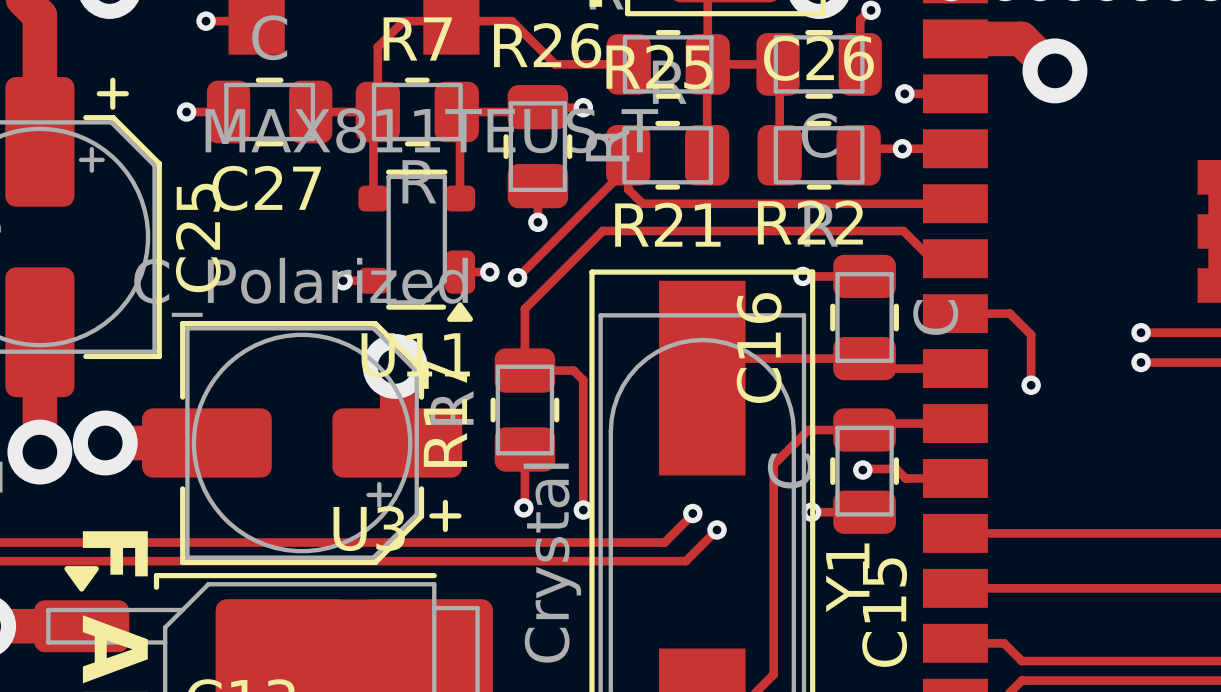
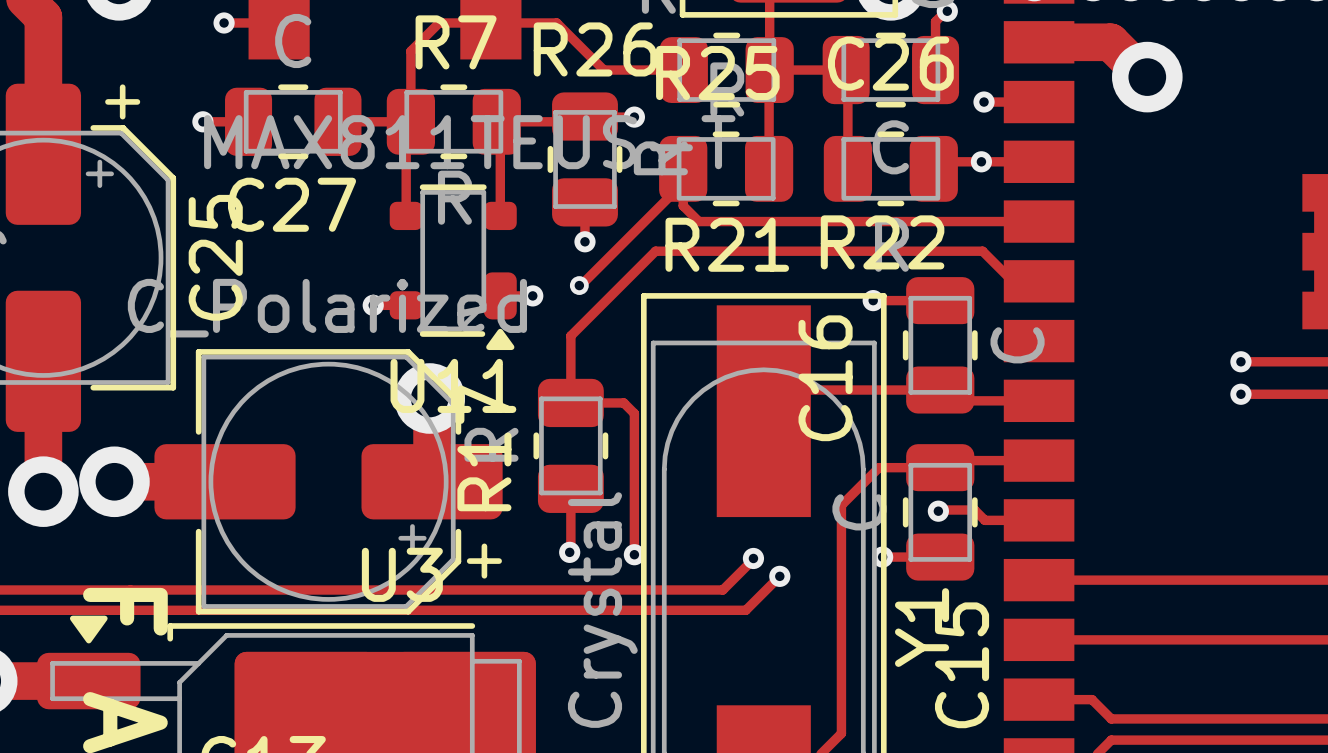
track: (628, 167) (517, 277) -> (683, 183) (579, 285)
via position: (517, 277) -> (579, 285)
track: (955, 313) (1009, 313) (1031, 334) (1031, 385) -> none
via: (1031, 385) -> none

